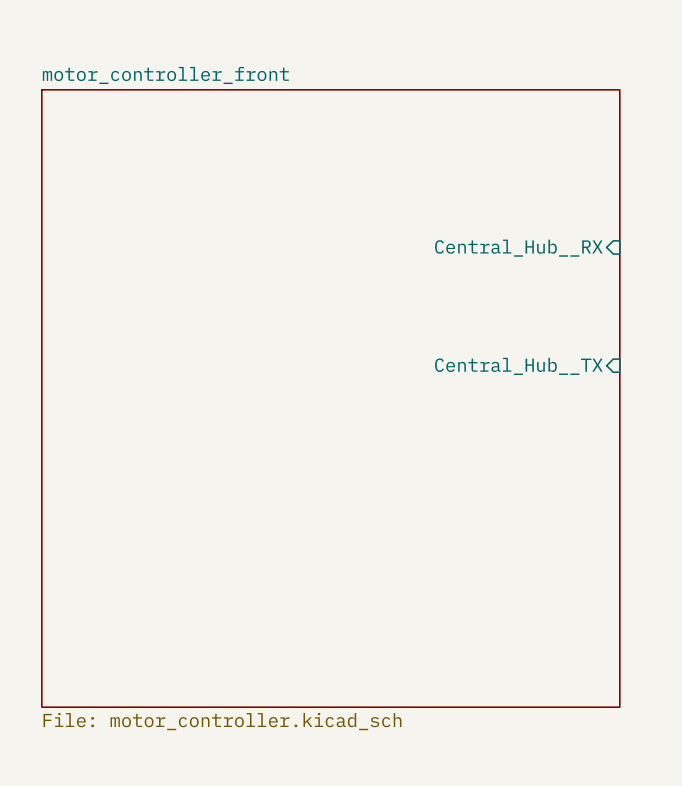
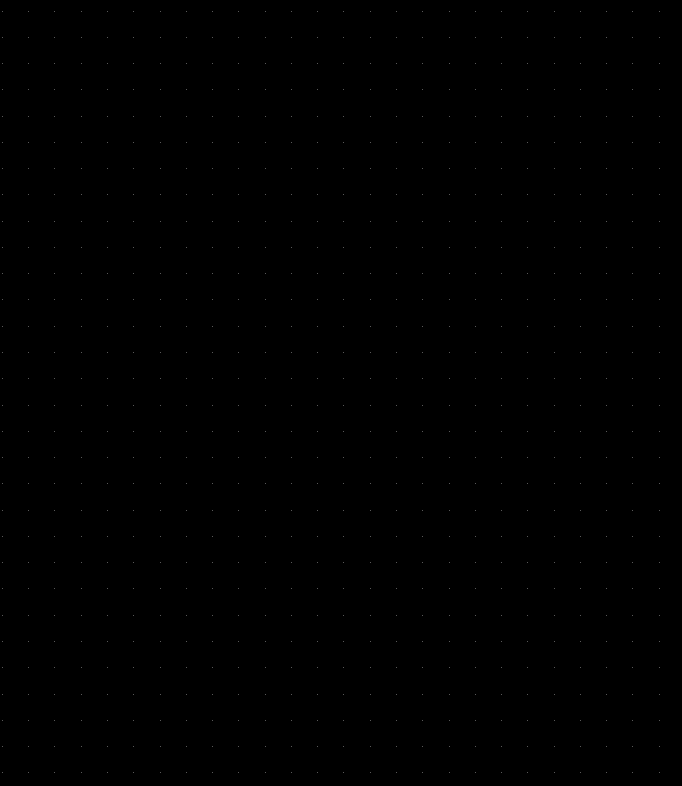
sheet pin: Central_Hub__RX (518, 248) -> none
sheet pin: Central_Hub__TX (518, 366) -> none
sheet motor_controller_front: File: motor_controller.kicad_sch (330, 398) -> none

